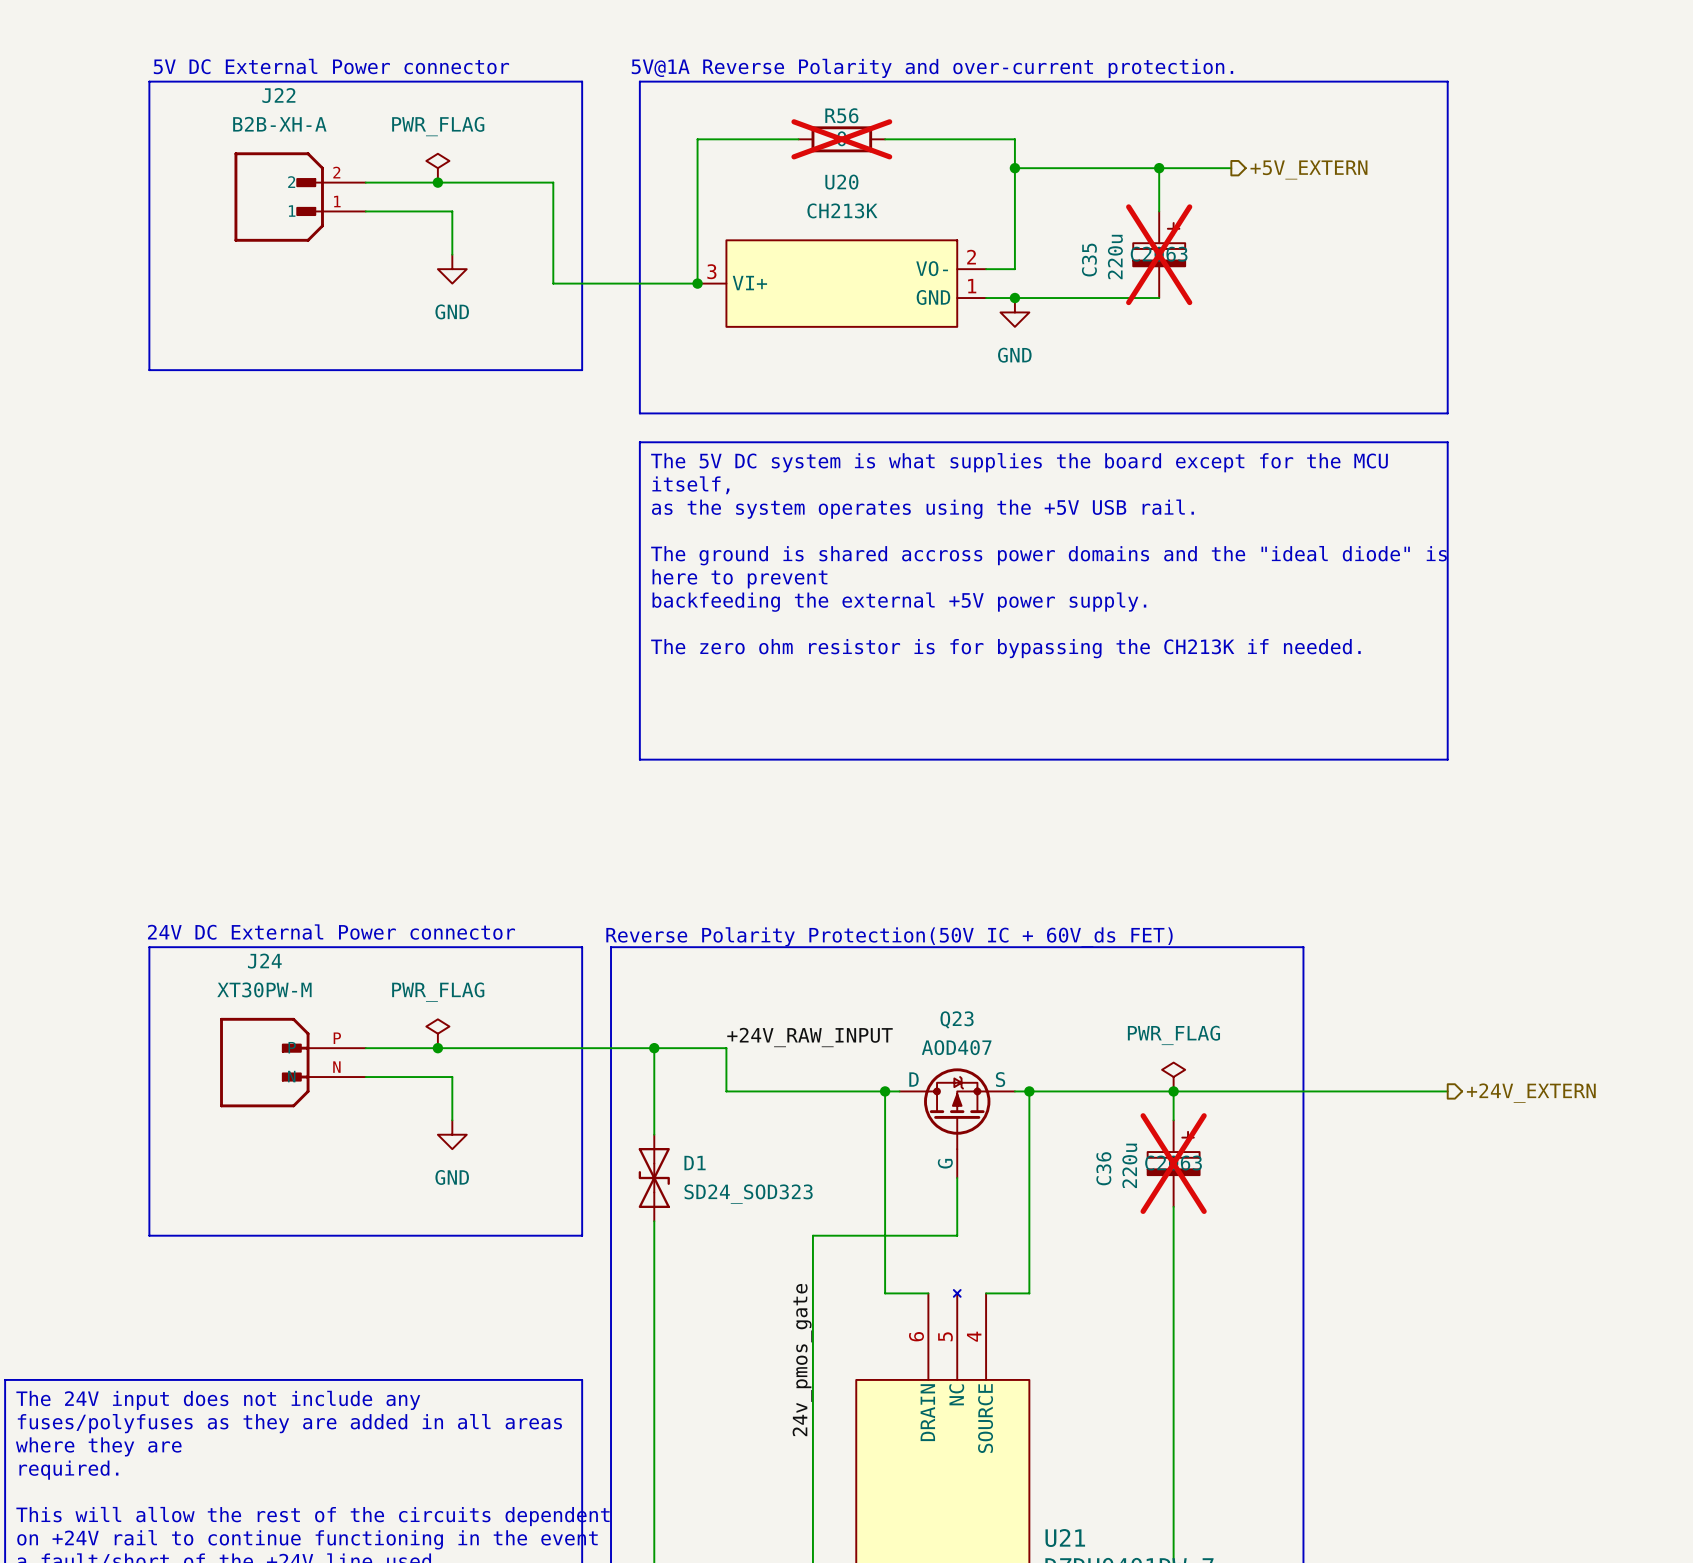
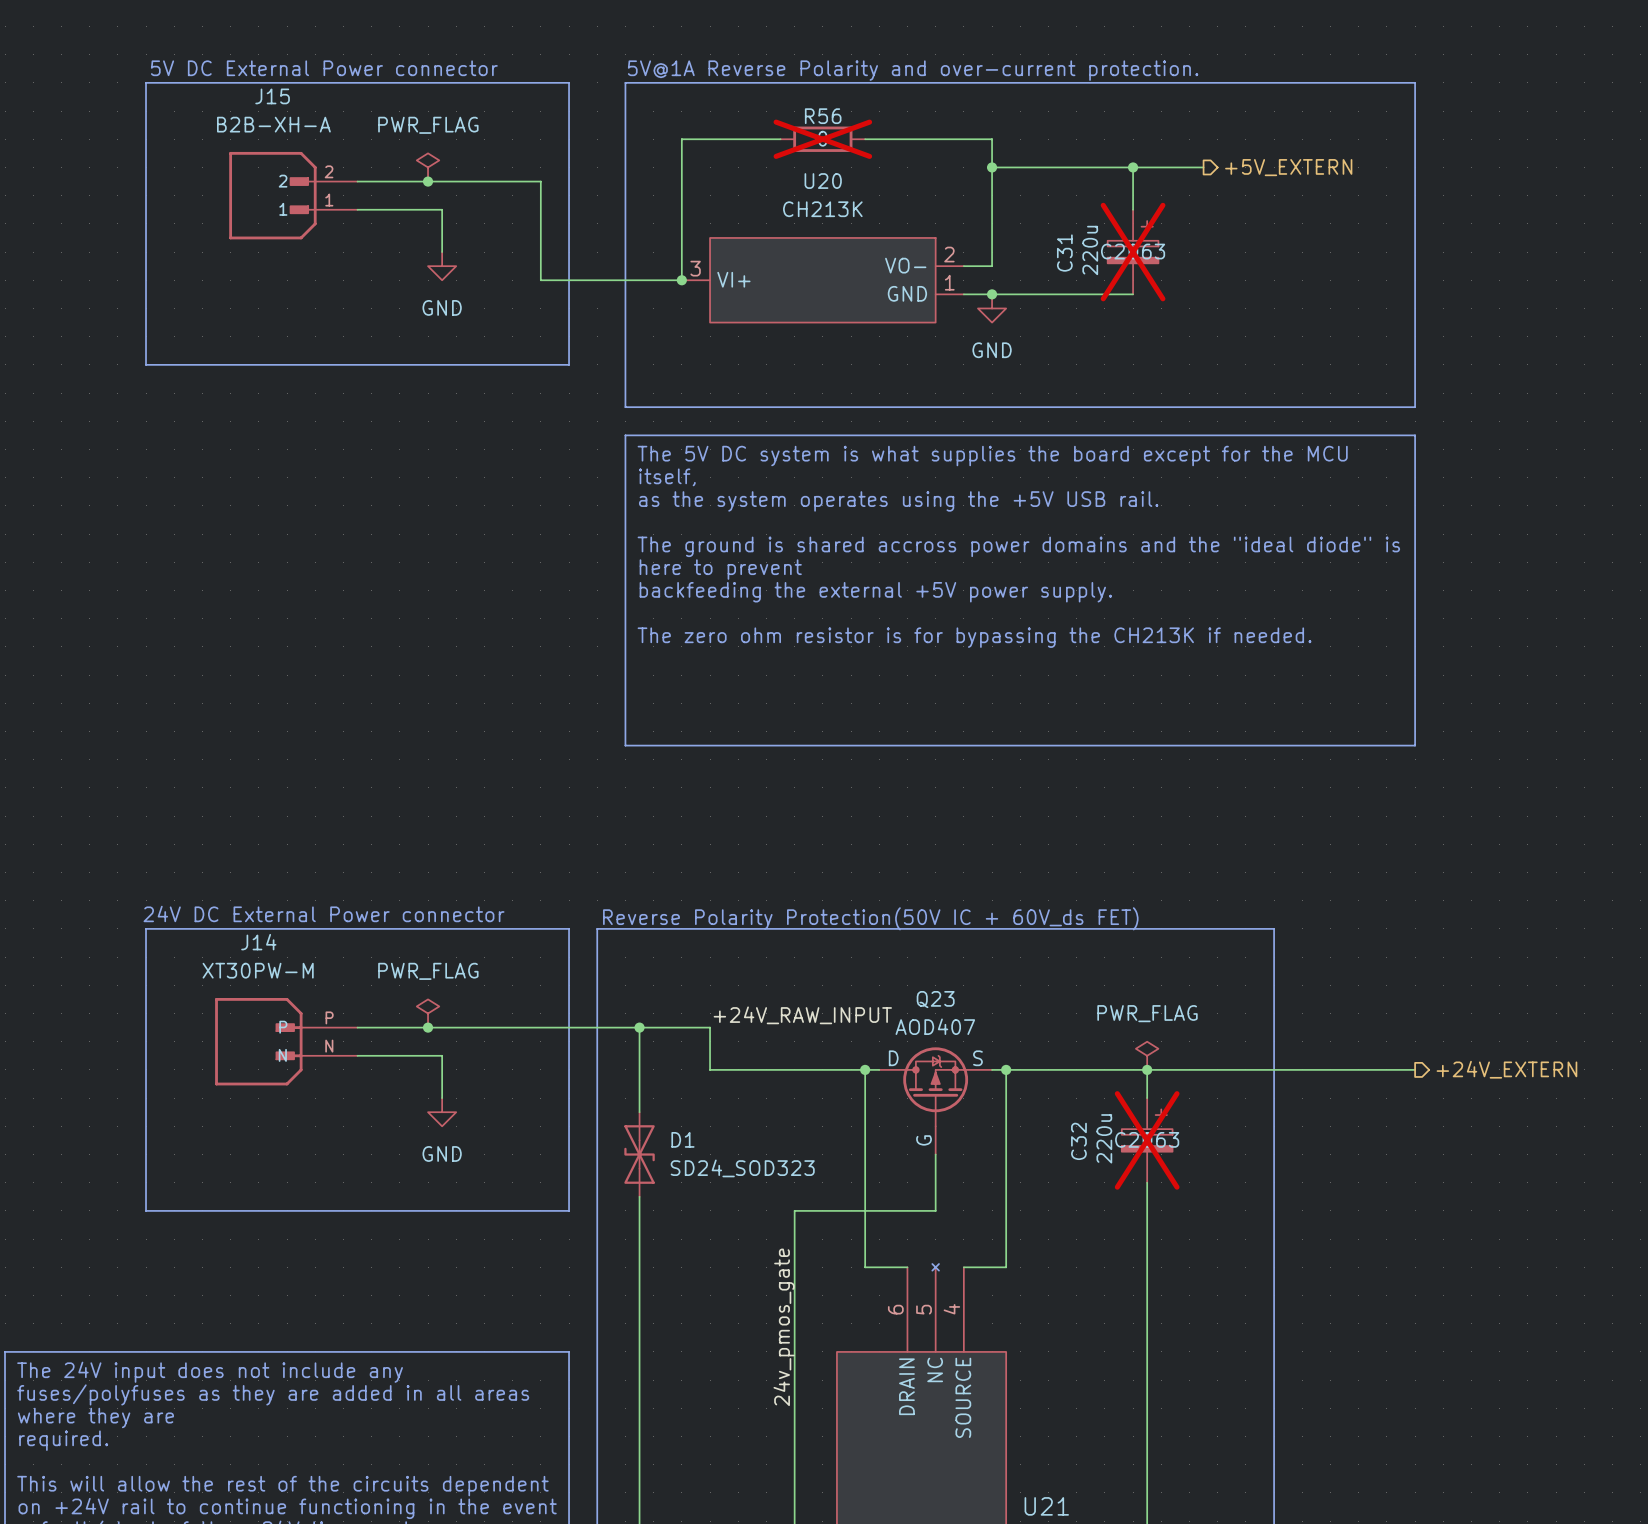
J22 name: J22 (278, 95) -> J15 (272, 96)
C35 name: C35 (1089, 260) -> C31 (1064, 253)
J24 name: J24 (264, 961) -> J14 (258, 942)
C36 name: C36 (1103, 1168) -> C32 (1078, 1141)

